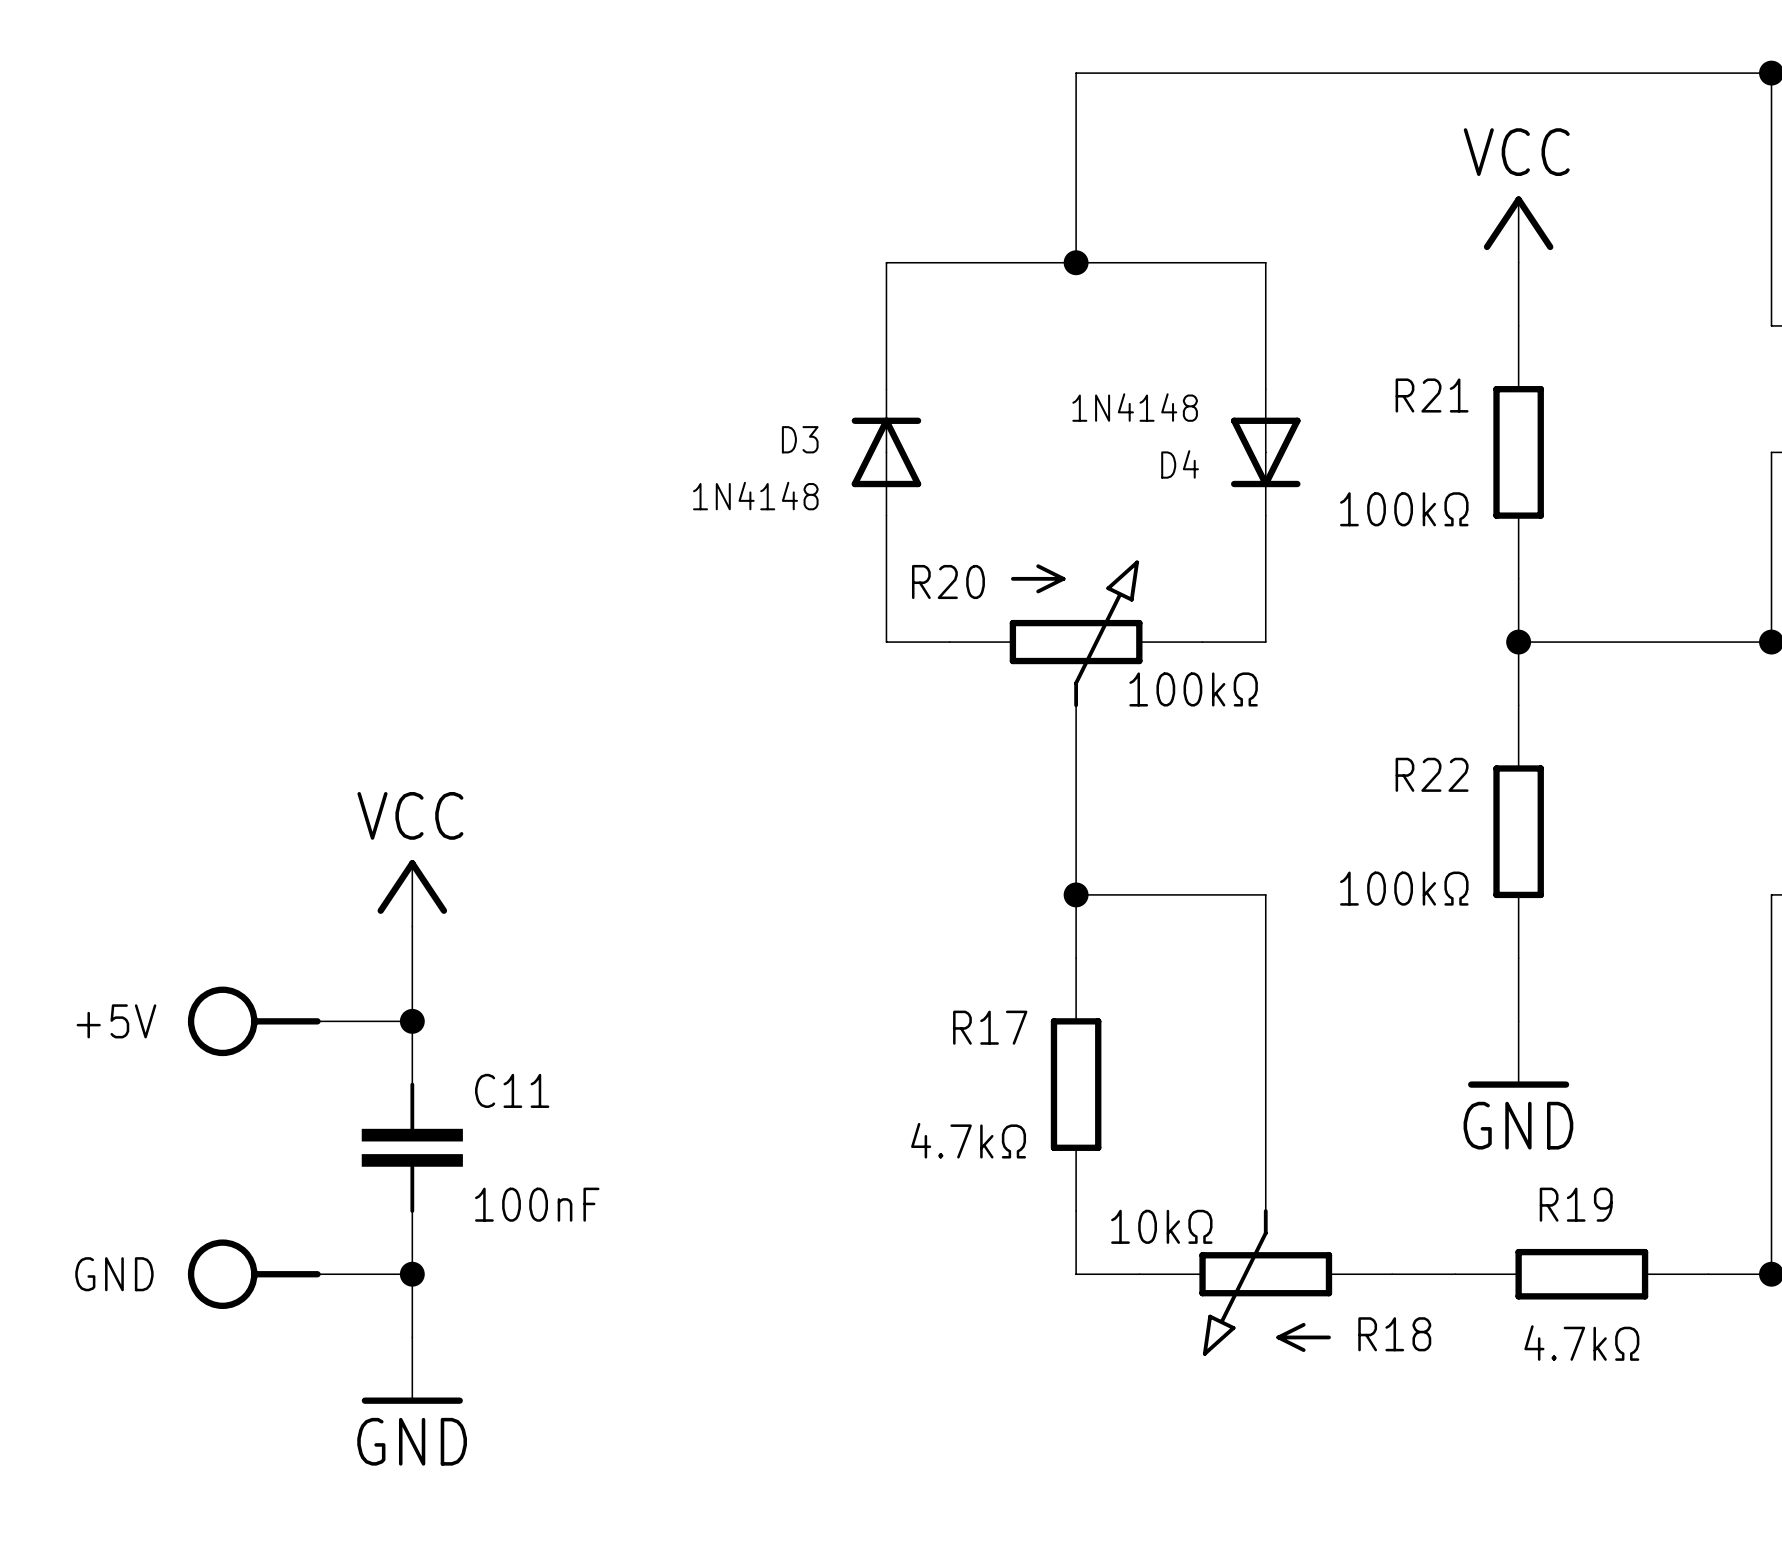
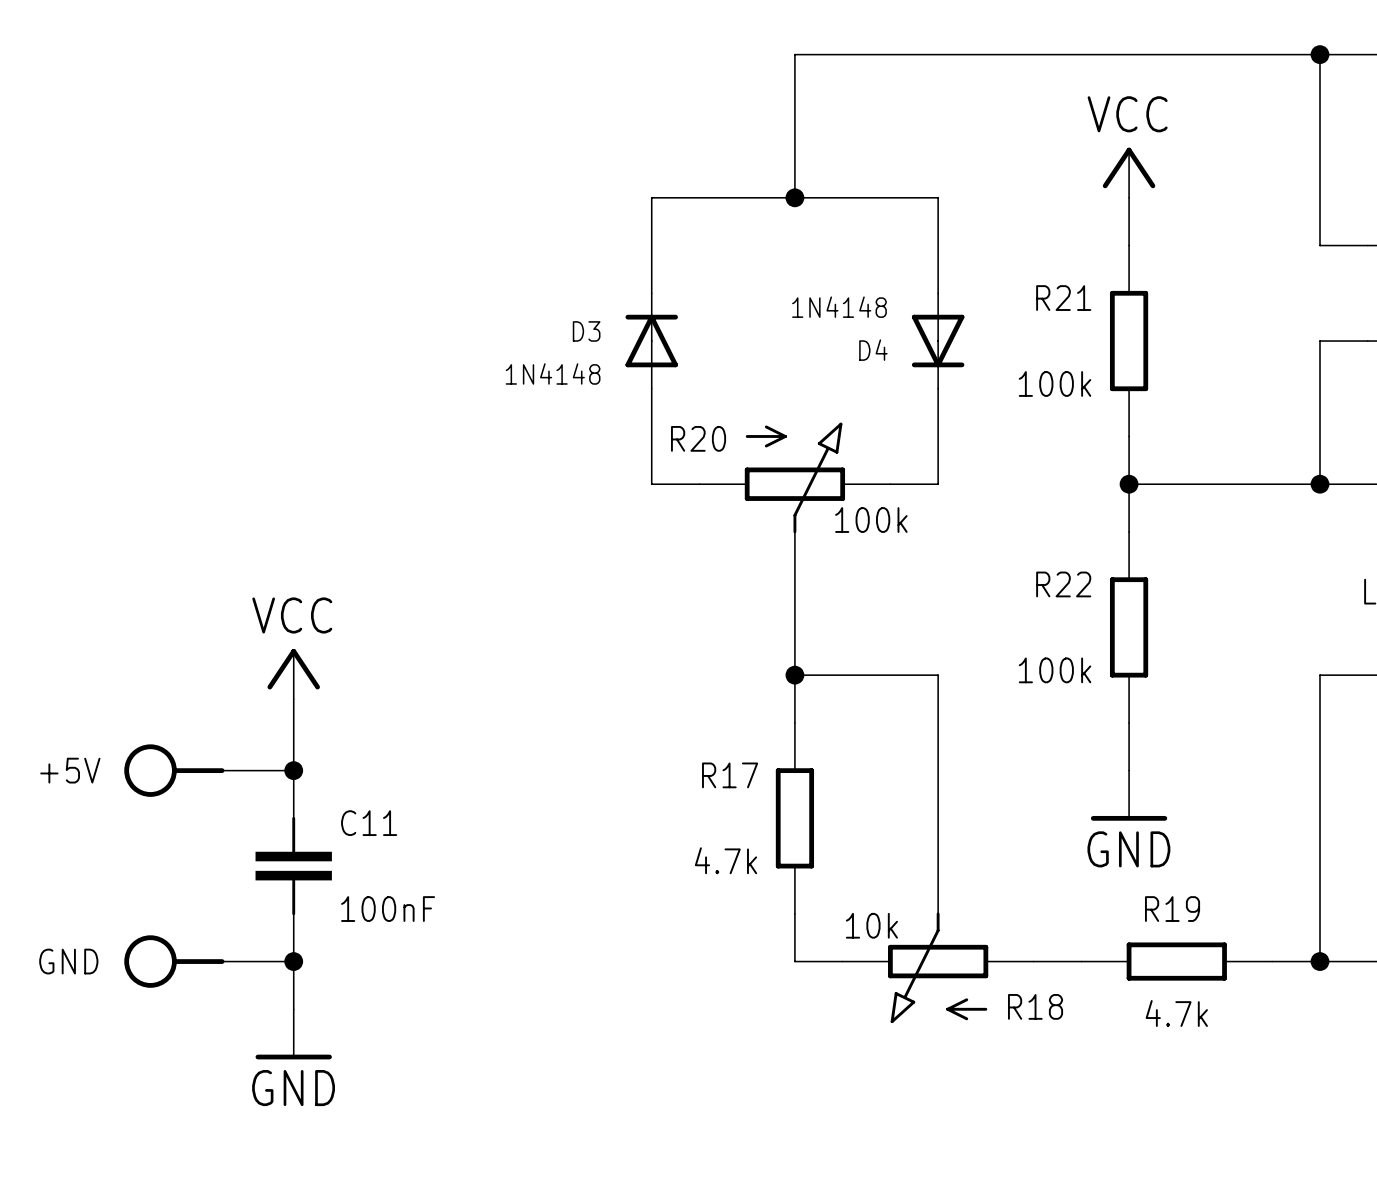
R21 value: 100kΩ (1404, 509) -> 100k (1055, 383)
R20 value: 100kΩ (1193, 689) -> 100k (871, 520)
R22 value: 100kΩ (1404, 888) -> 100k (1055, 670)
R17 value: 4.7kΩ (968, 1140) -> 4.7k (725, 860)
R18 value: 10kΩ (1161, 1226) -> 10k (871, 925)
R19 value: 4.7kΩ (1581, 1343) -> 4.7k (1176, 1013)

